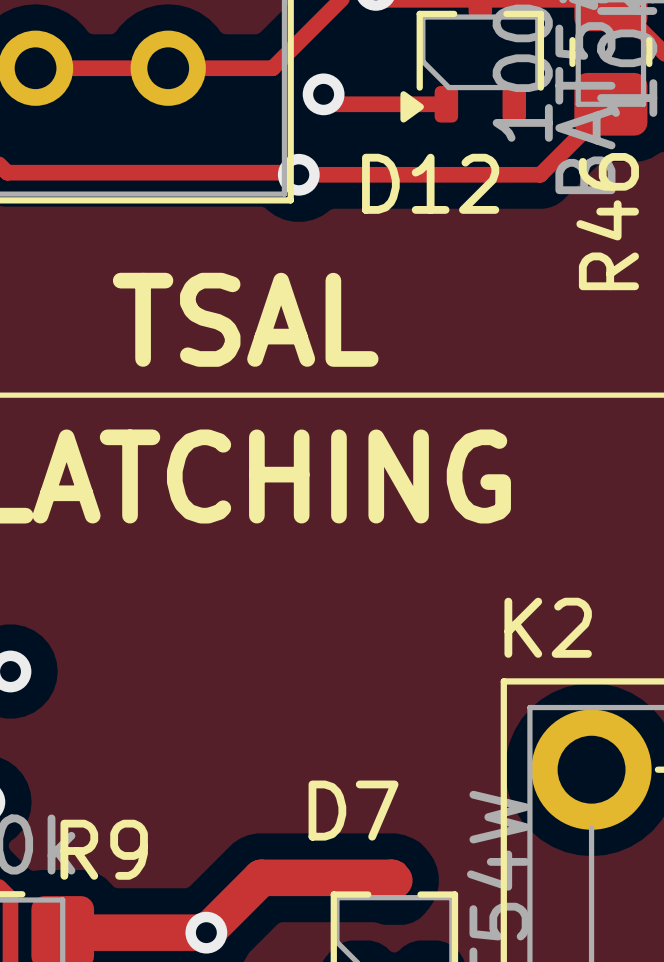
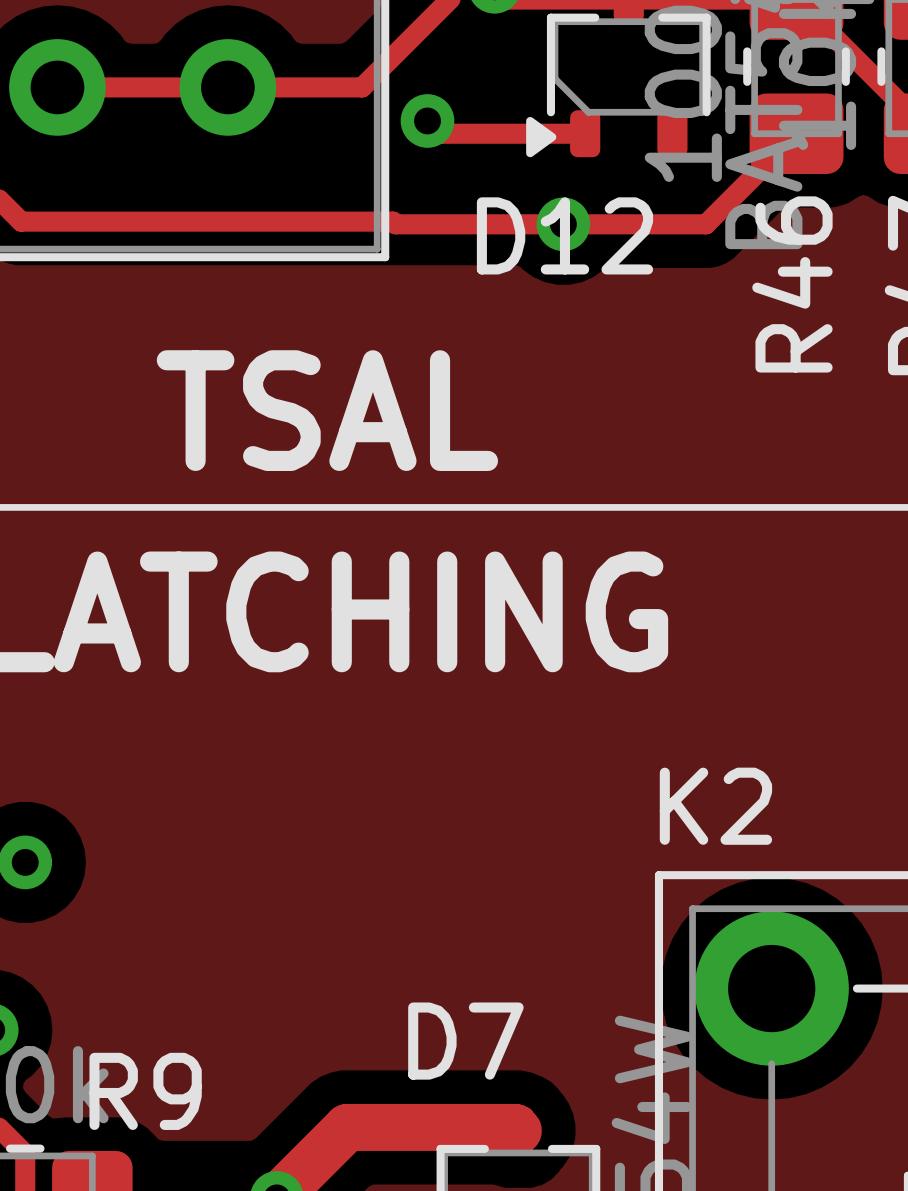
via position: (298, 174) -> (563, 224)

